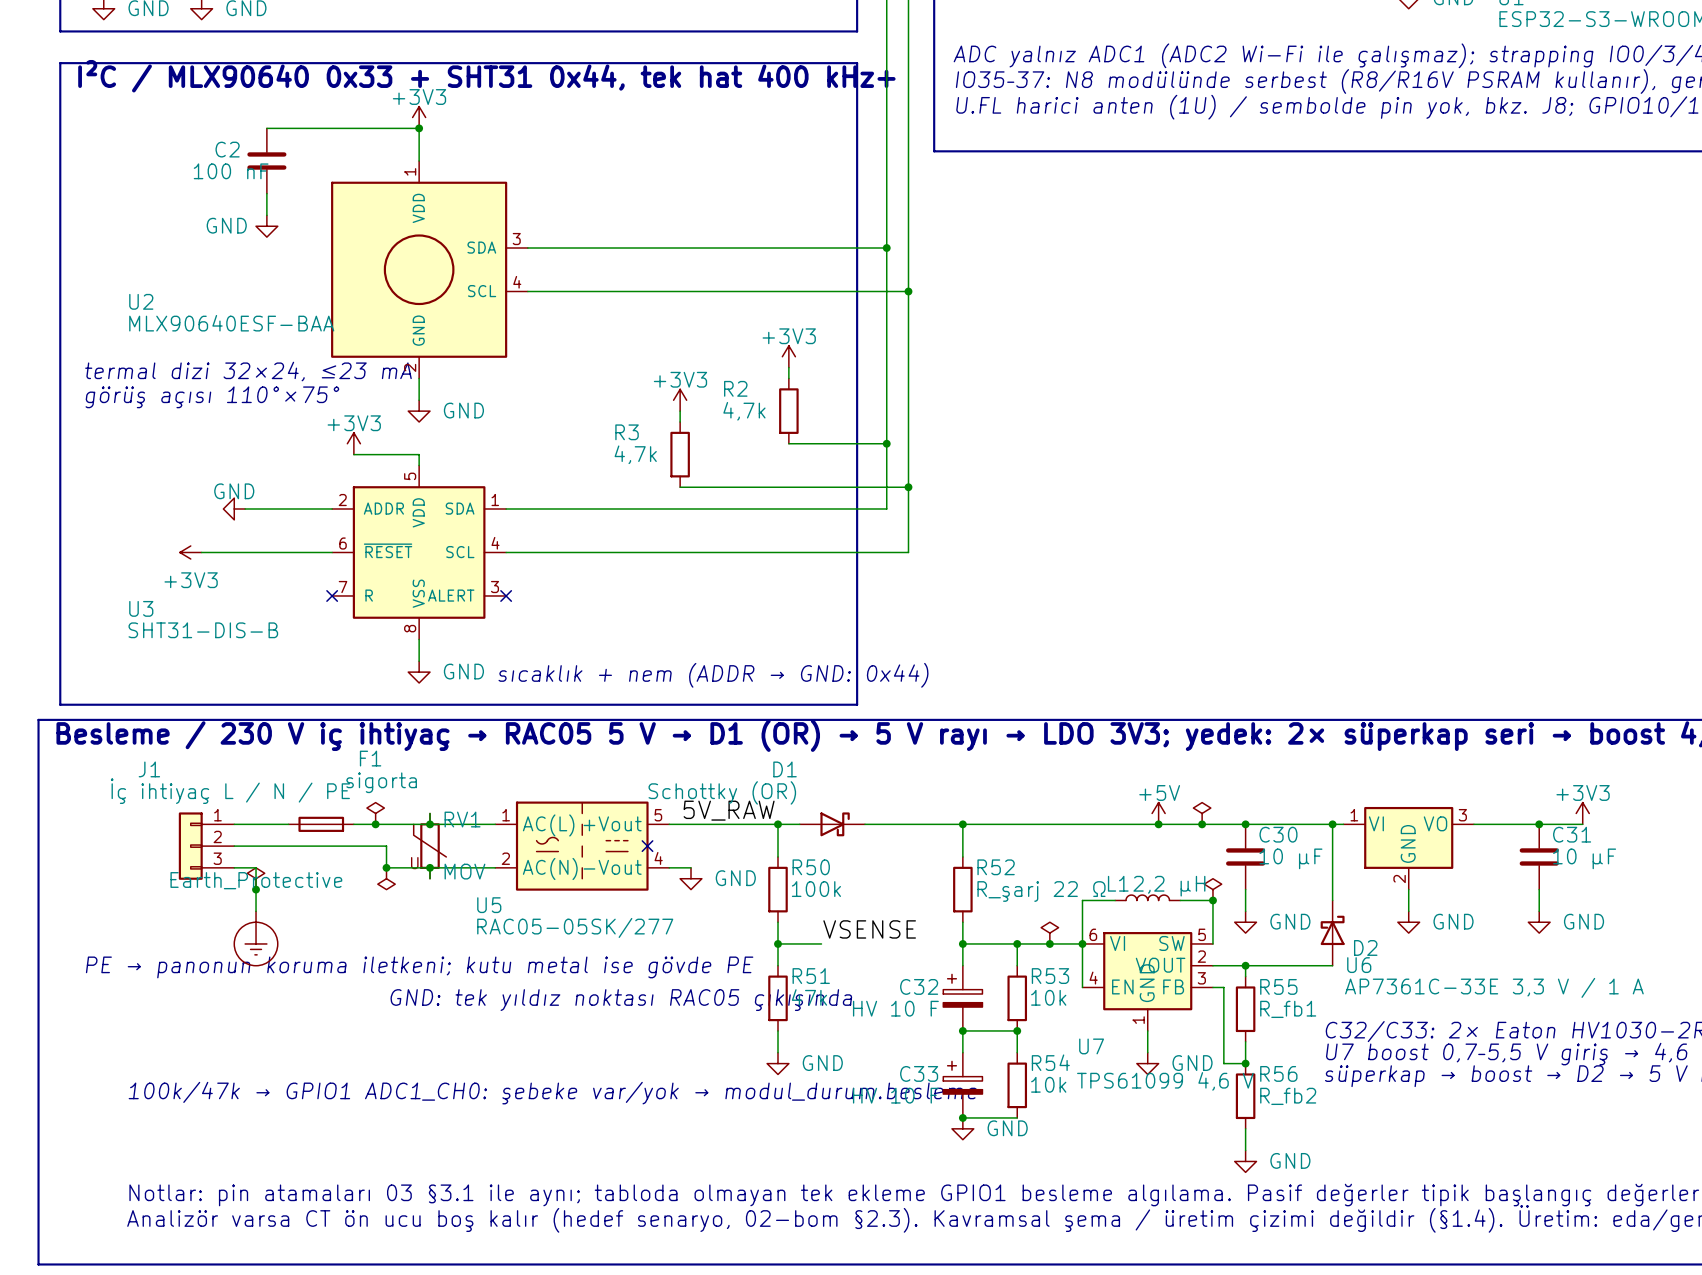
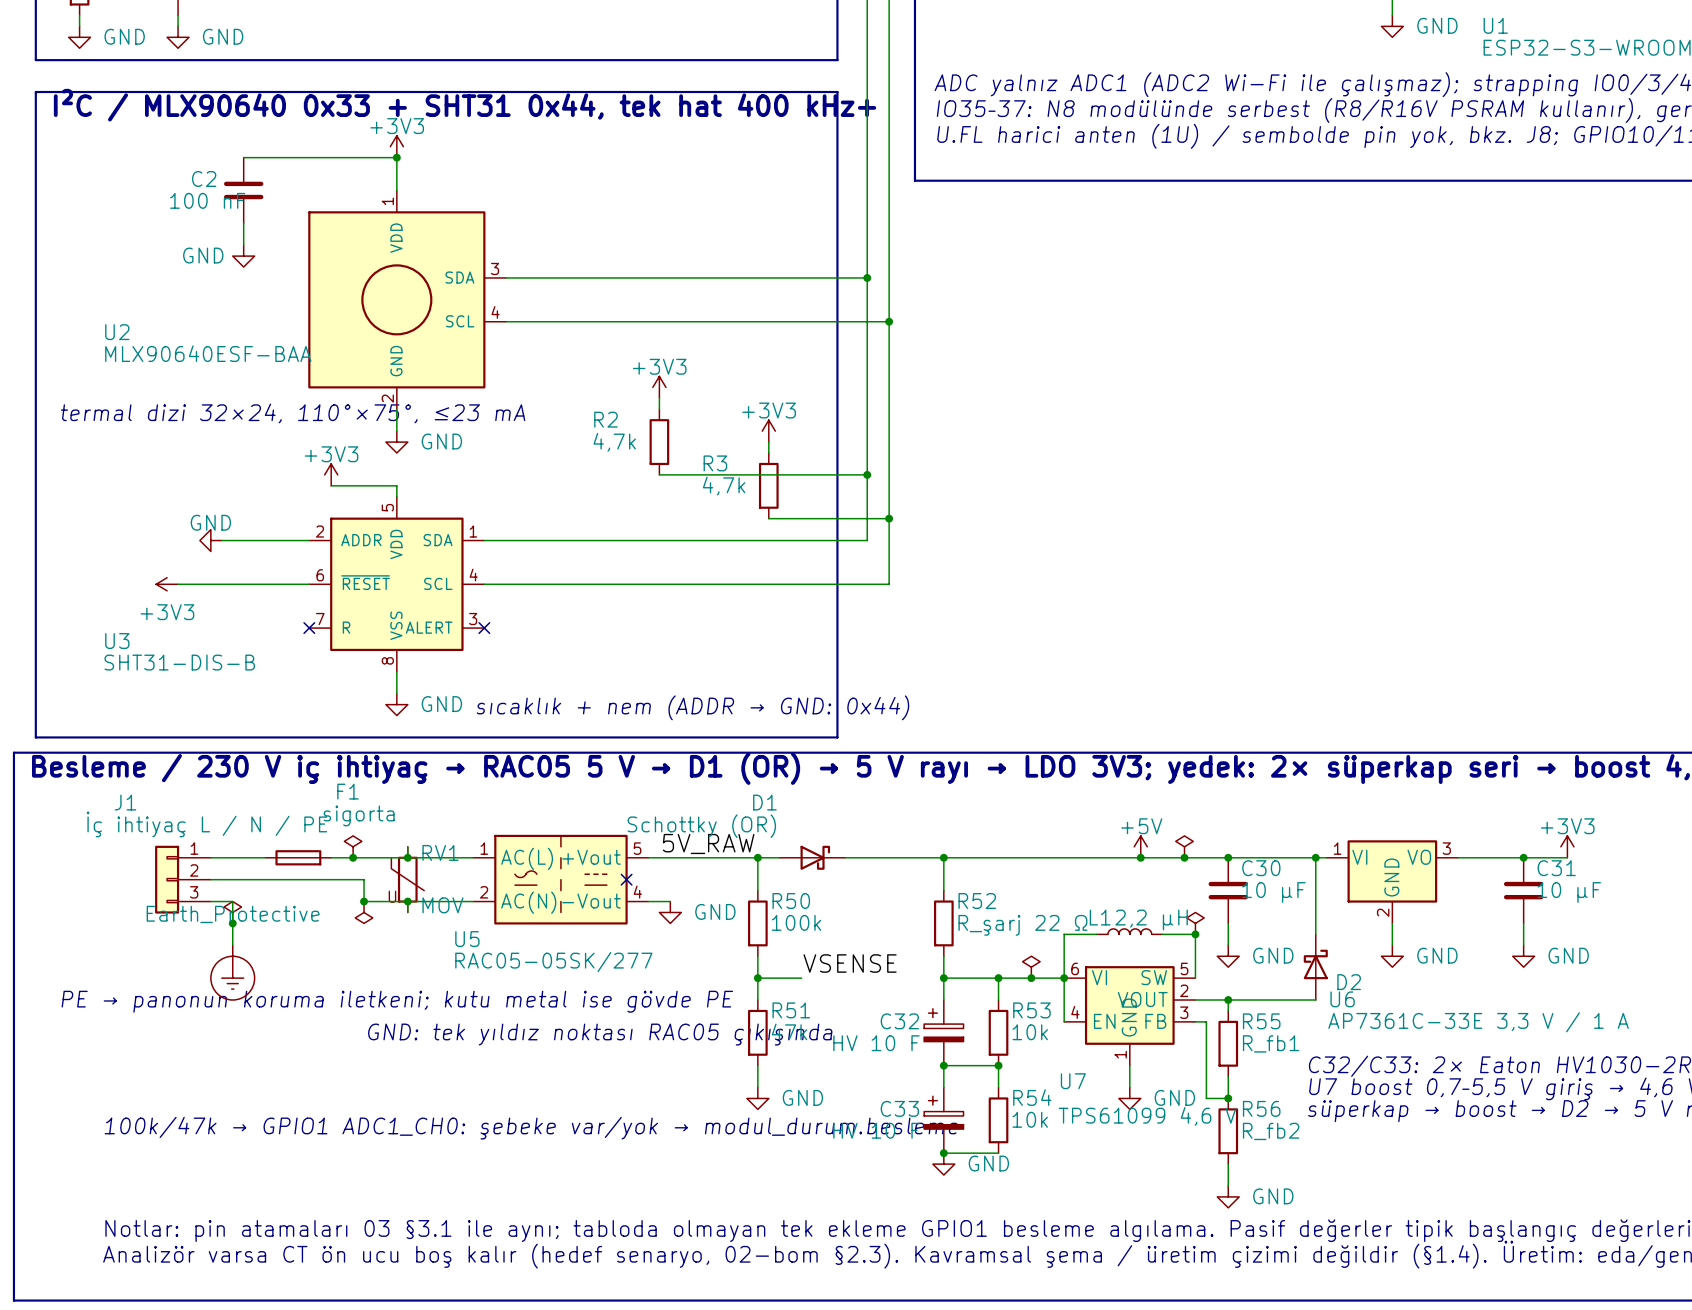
power symbol position: +3V3 (788, 356) -> +3V3 (768, 431)
wire: (788, 367) (788, 378) -> (768, 442) (768, 453)
text: termal dizi 32×24, ≤23 mA (248, 371) -> termal dizi 32×24, 110°×75°, ≤23 mA (293, 413)
text: görüş açısı 110°×75° (212, 397) -> none
power symbol position: +3V3 (680, 400) -> +3V3 (659, 387)
wire: (680, 411) (680, 421) -> (659, 398) (659, 409)
R2 position: (788, 411) -> (659, 442)
R3 position: (680, 454) -> (768, 485)
wire: (680, 487) (788, 487) -> (659, 474) (768, 474)

